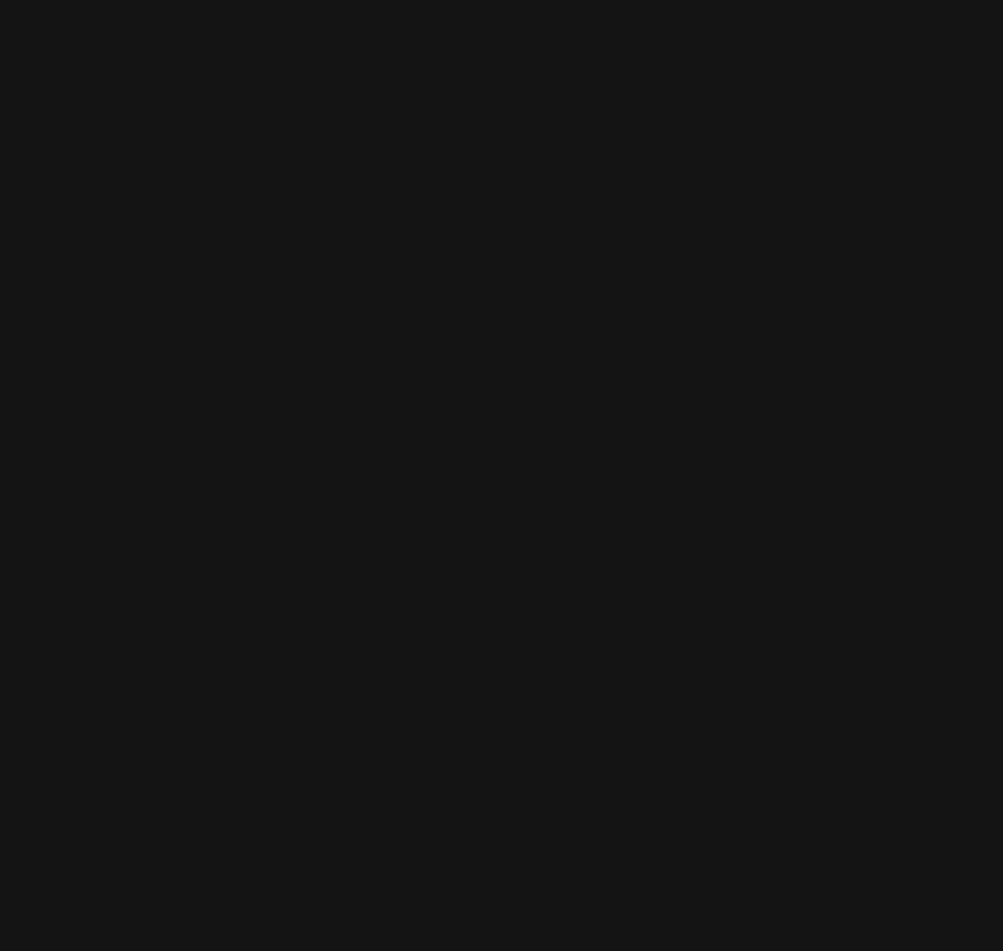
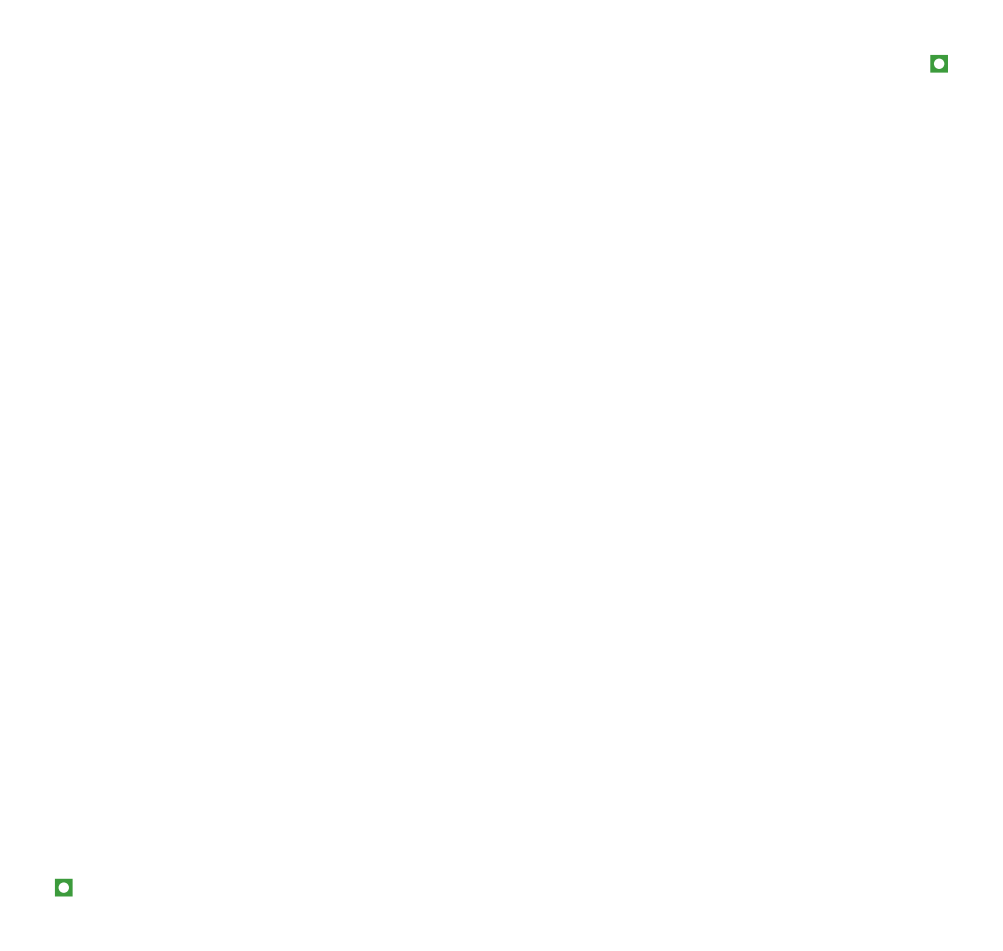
part: none -> (939, 63)
part: none -> (63, 887)

